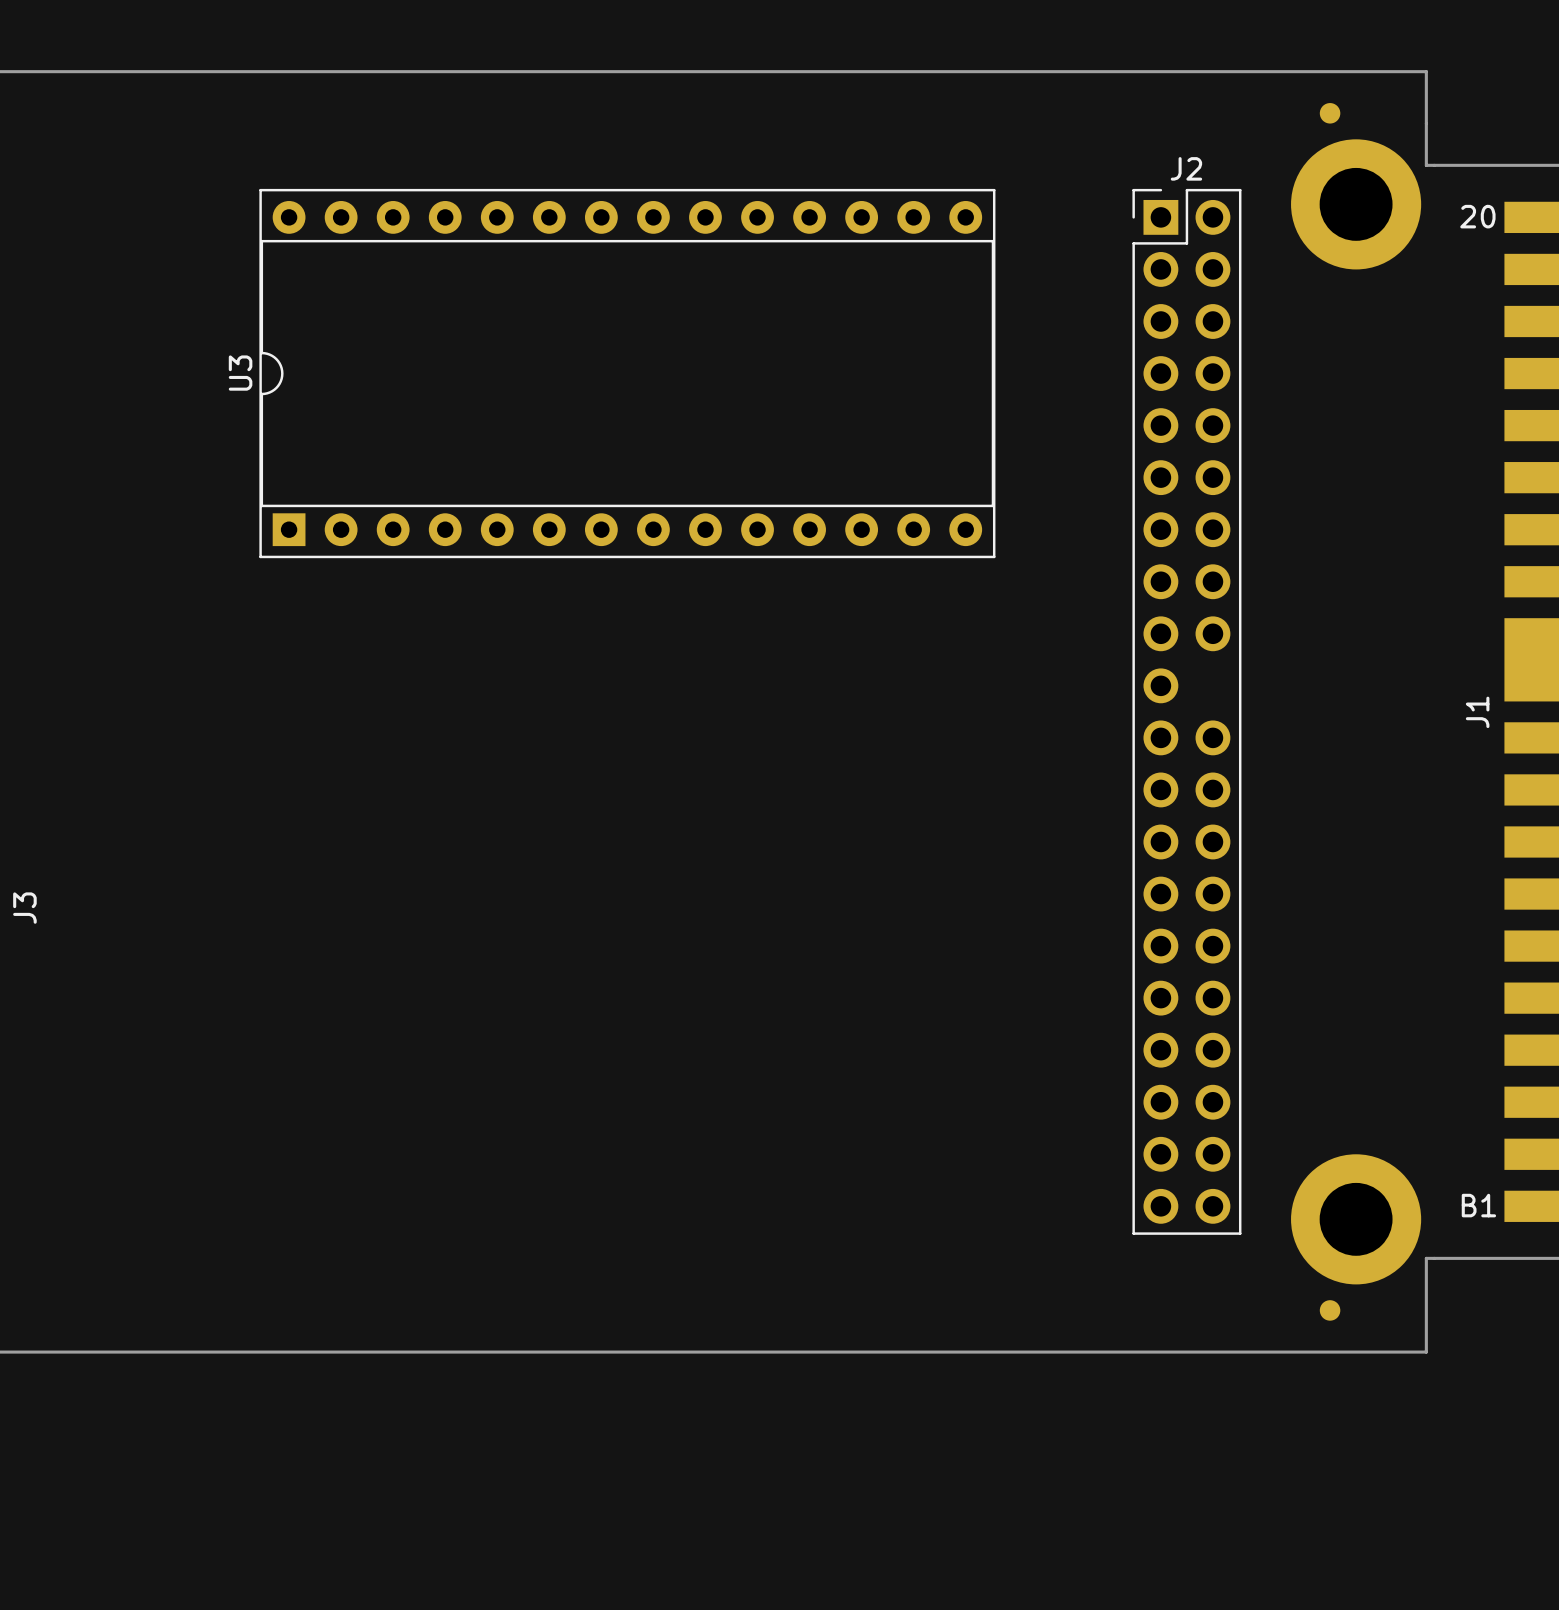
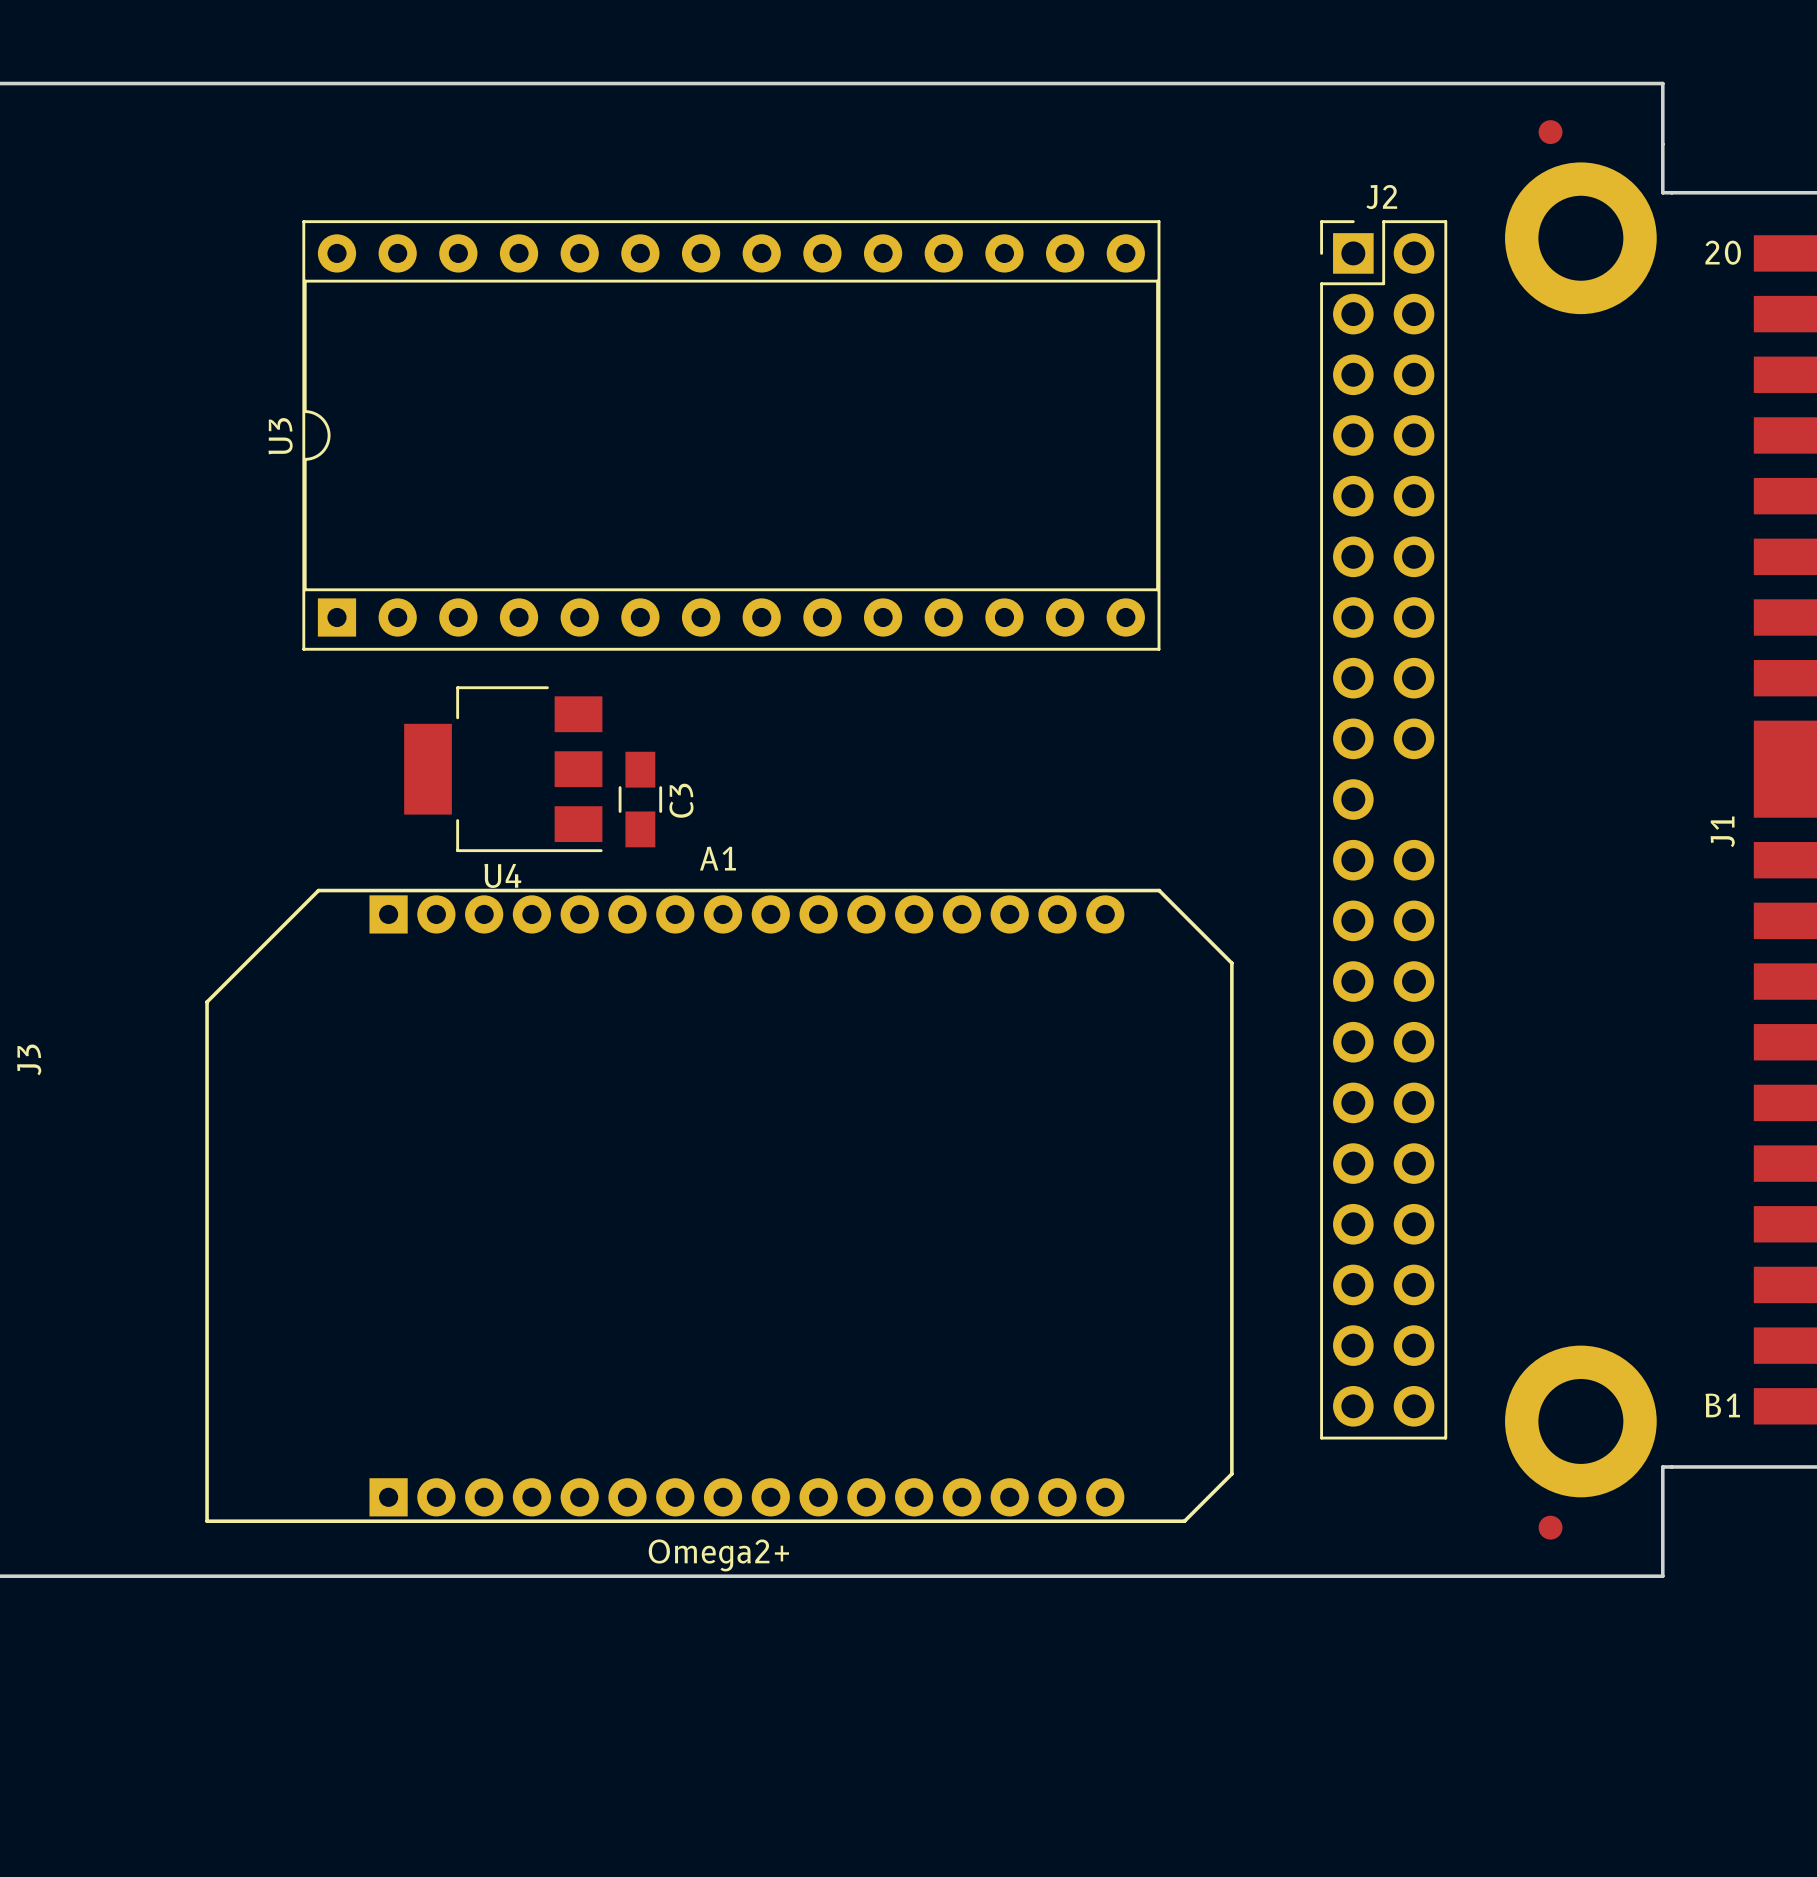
U4: none -> (503, 769)
C3: none -> (640, 799)
A1: none -> Omega2+ (719, 1205)

